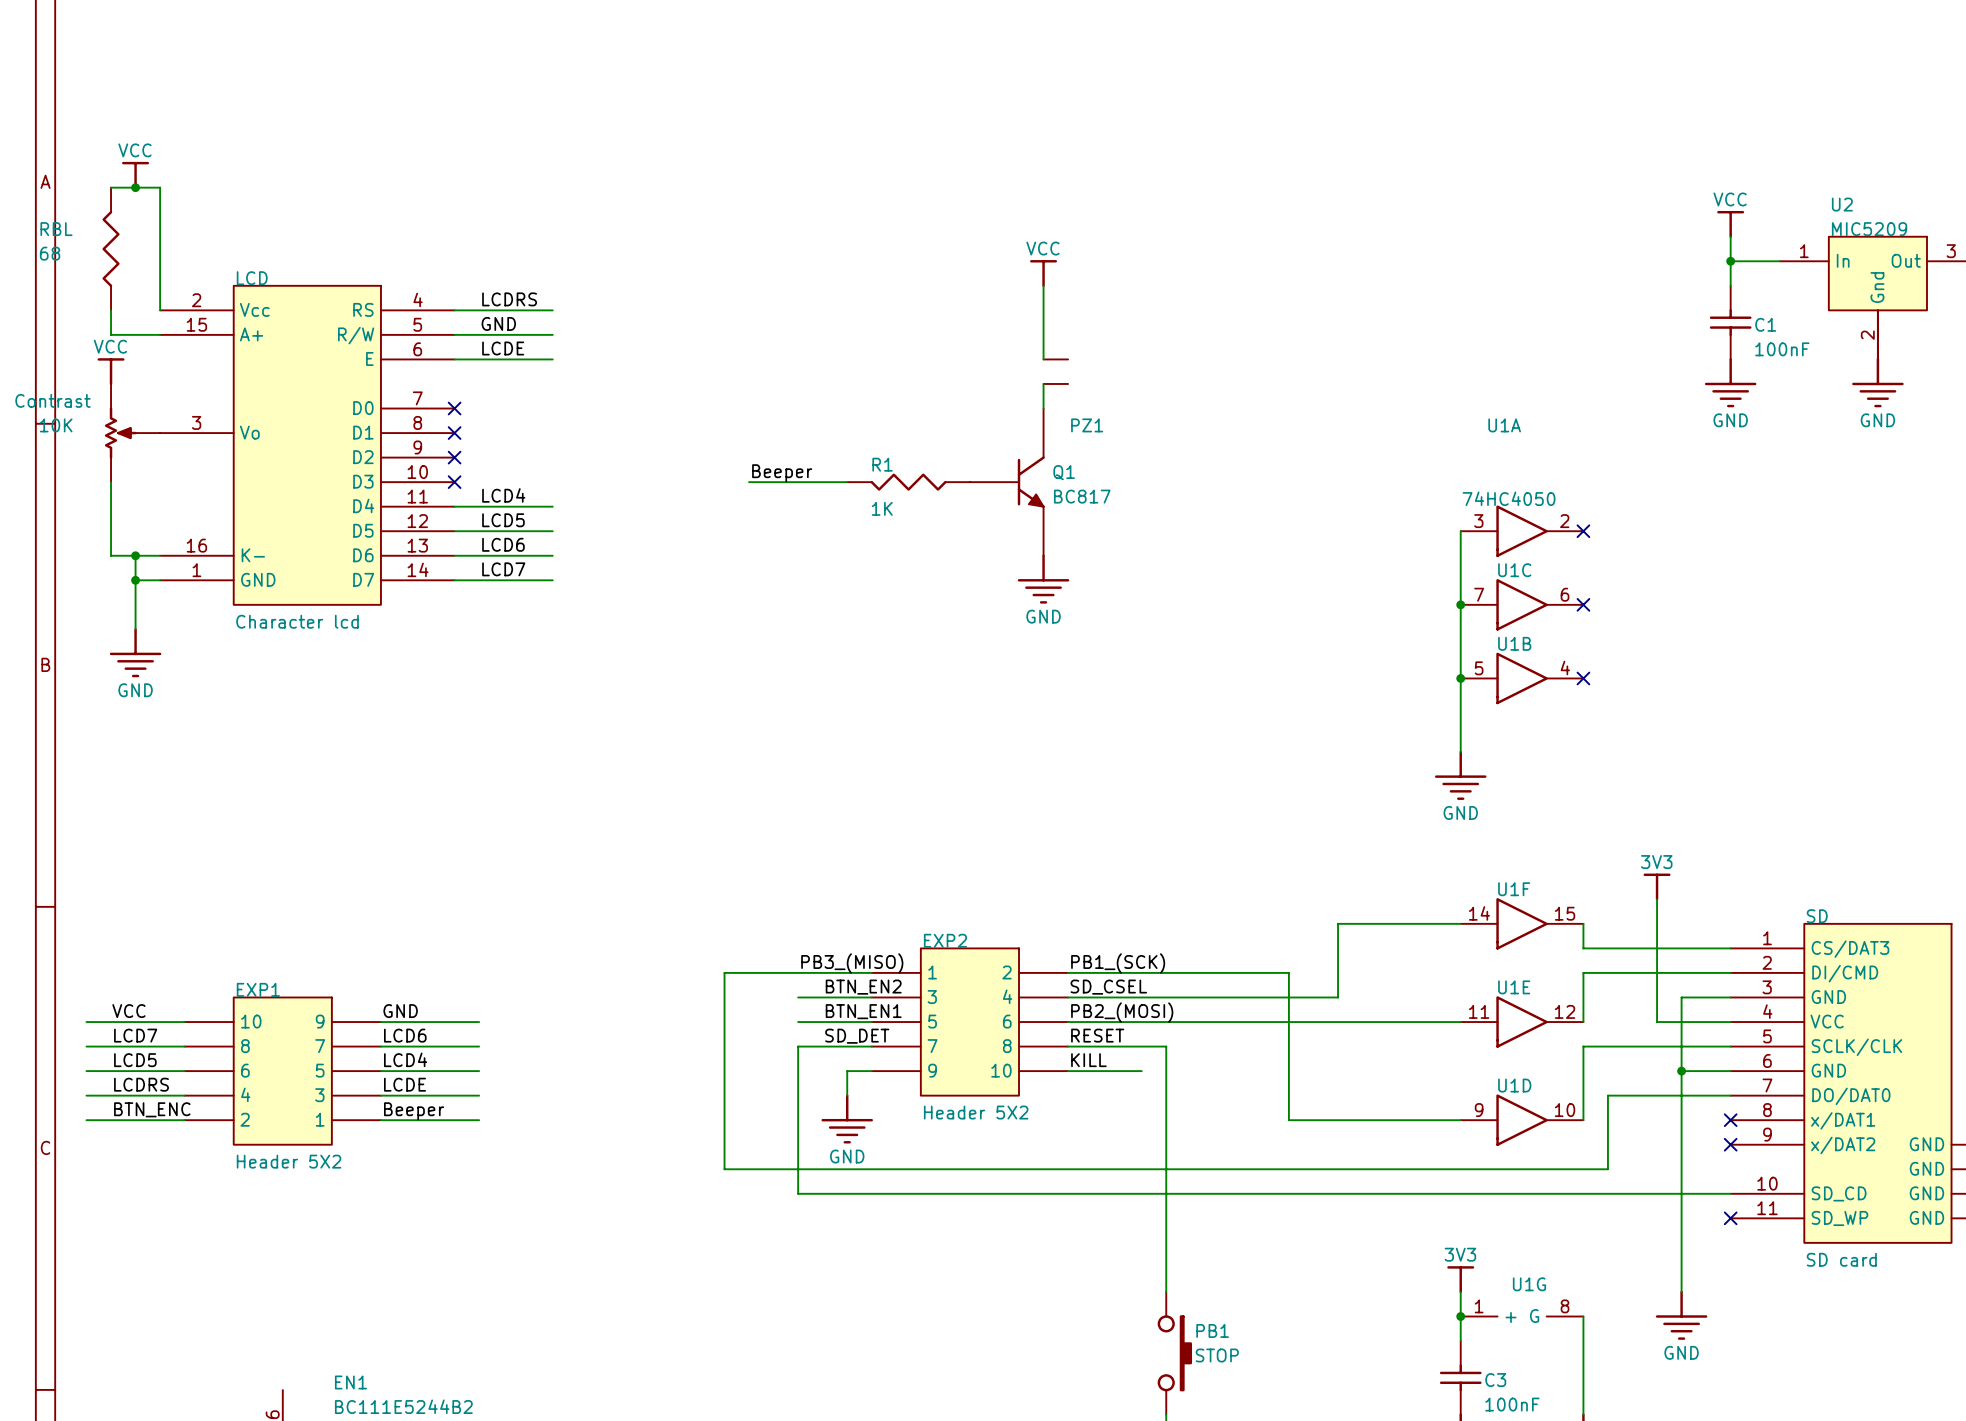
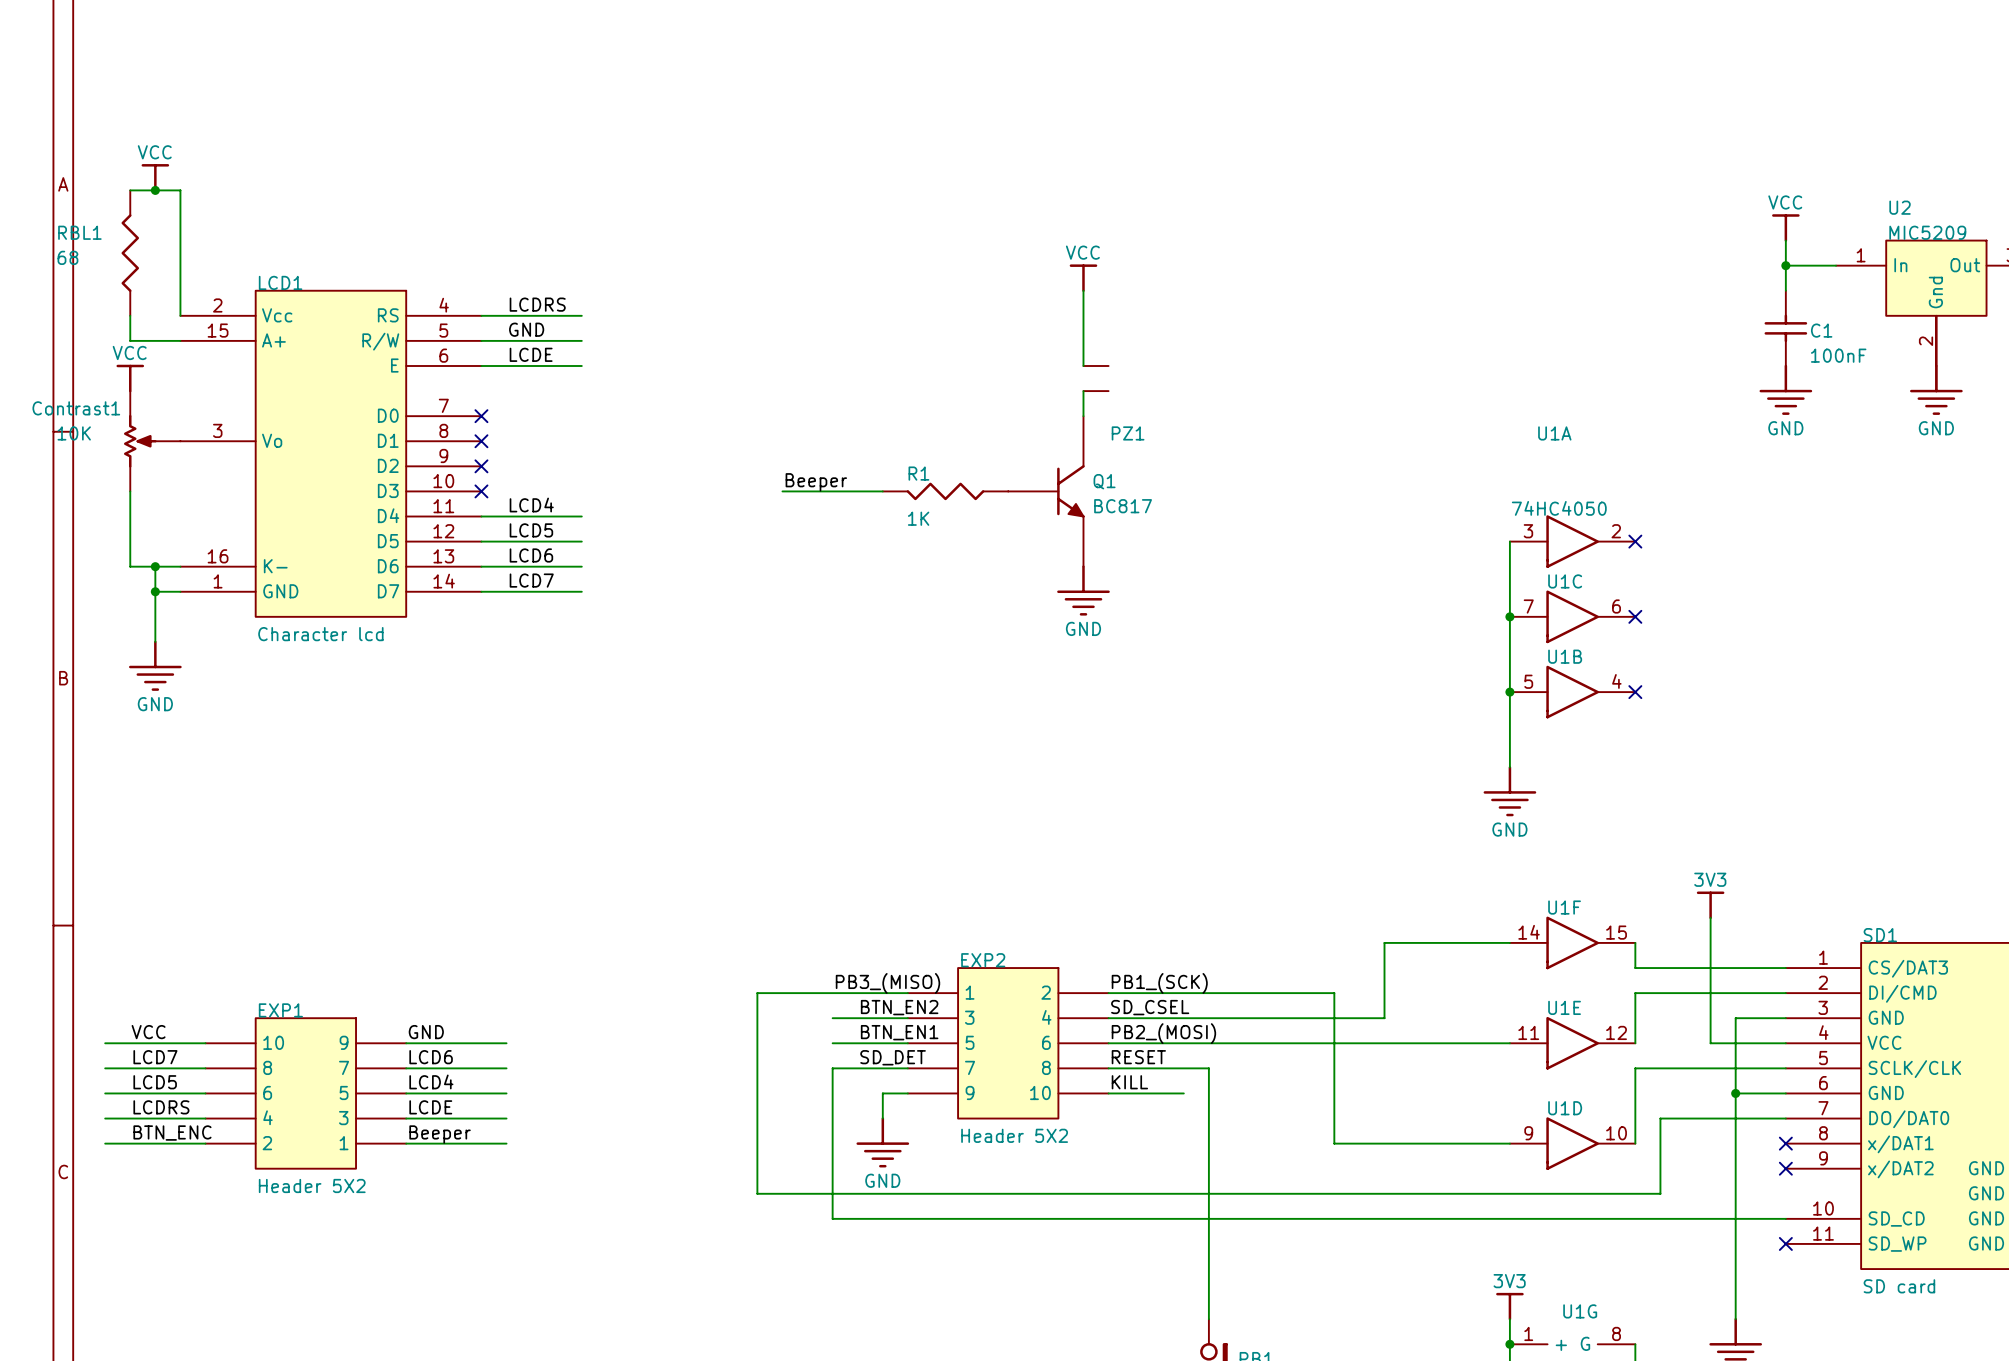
RBL name: RBL (56, 229) -> RBL1 (79, 232)
LCD name: LCD (252, 278) -> LCD1 (280, 282)
Contrast name: Contrast (52, 400) -> Contrast1 (76, 408)
SD name: SD (1817, 916) -> SD1 (1880, 935)

